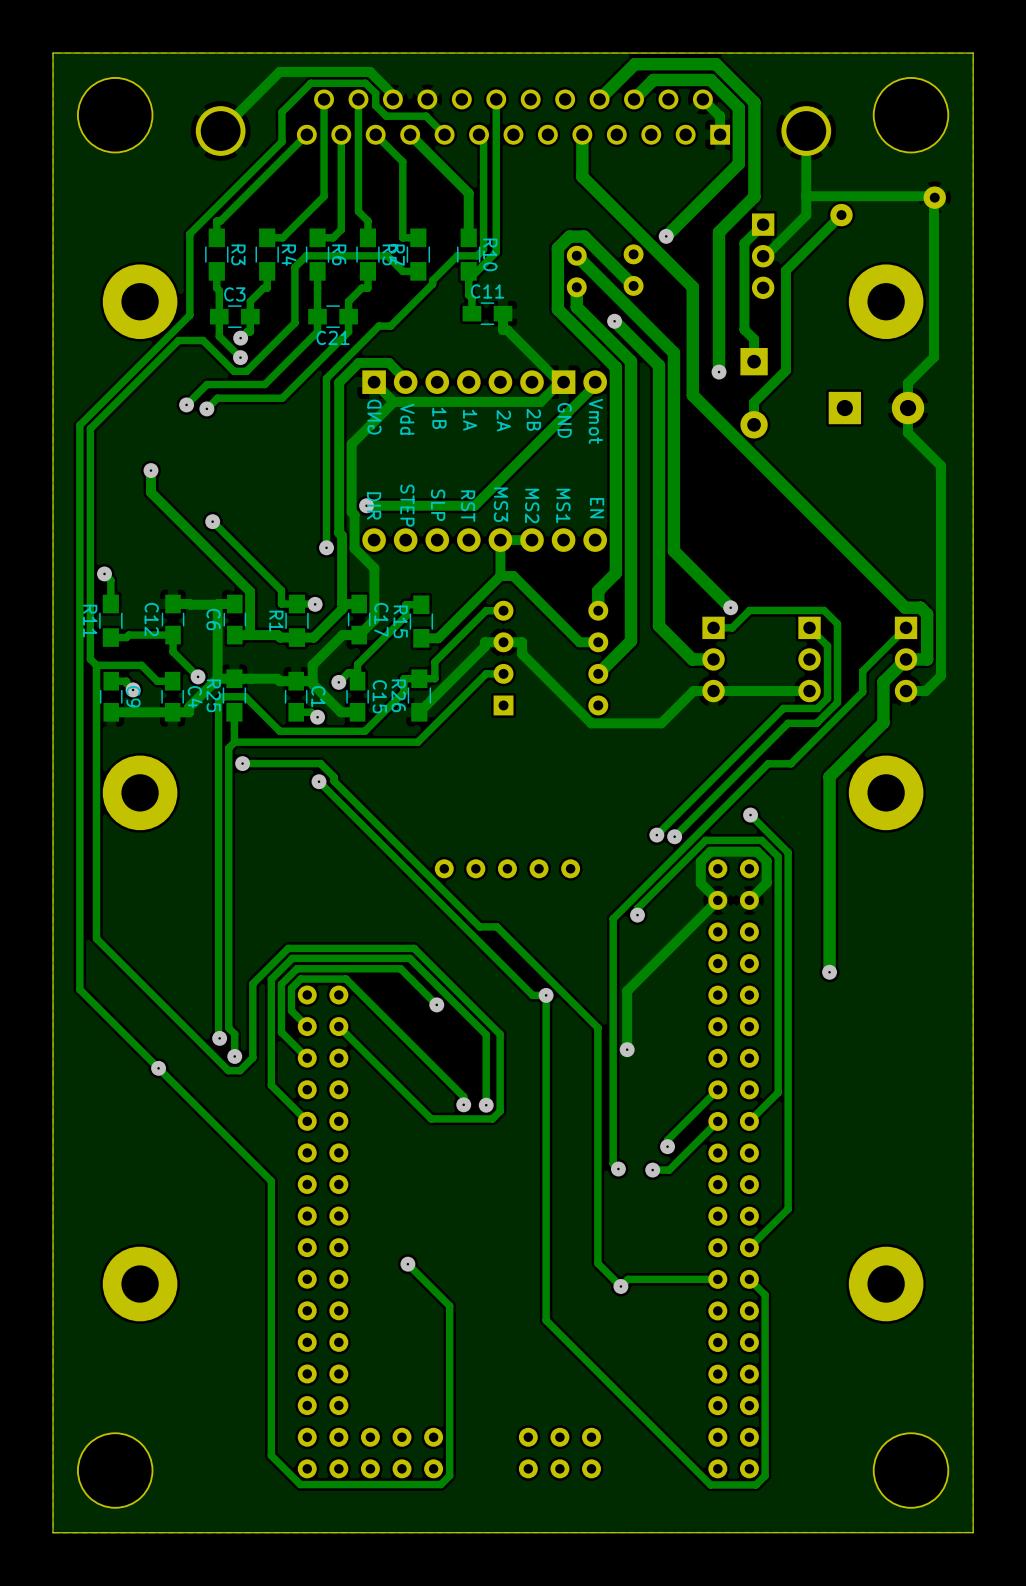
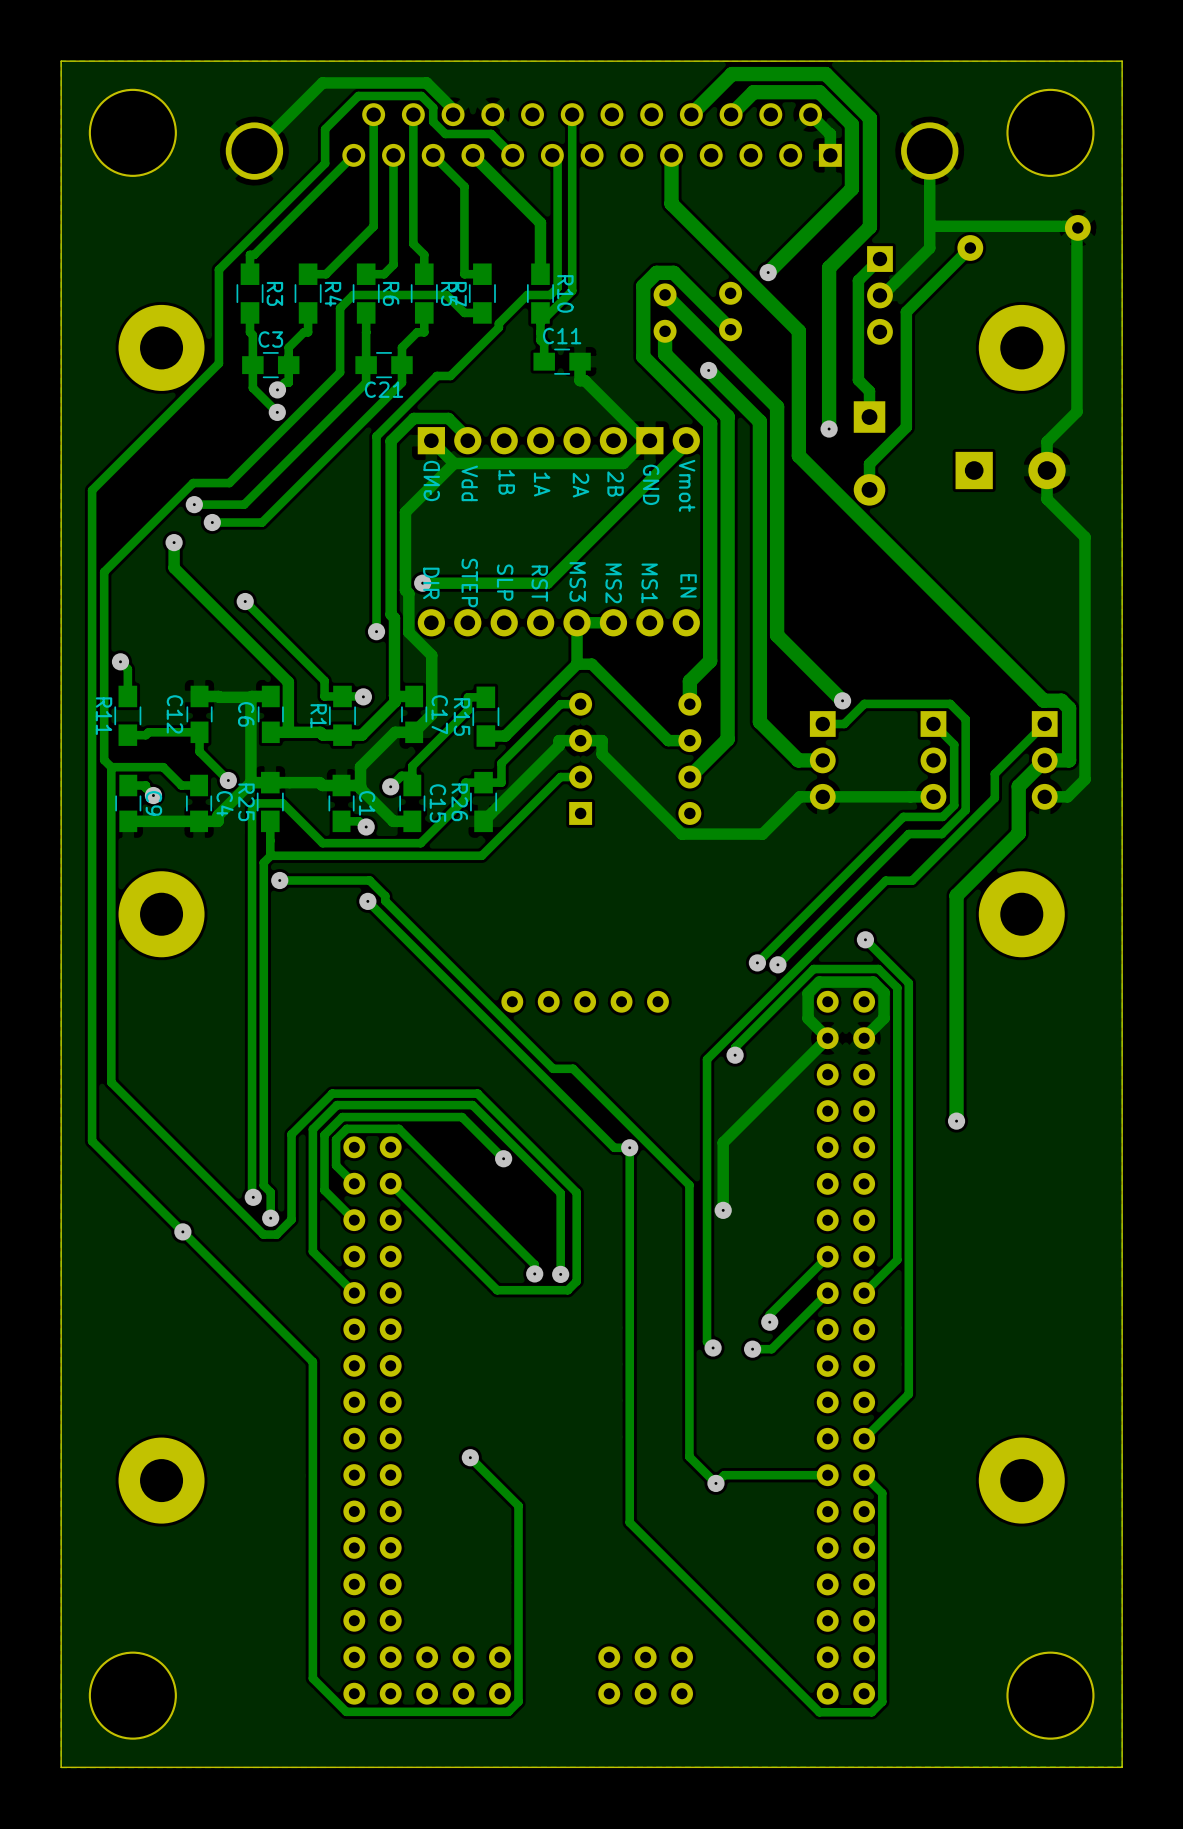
track: (317, 331) (264, 384) (206, 384) (186, 404) -> (366, 382) (244, 504) (194, 504)
track: (246, 371) (233, 371) (203, 340) (178, 340) (90, 428) (90, 496) -> (284, 428) (229, 483) (193, 483) (104, 572)
track: (282, 398) (217, 398) (206, 408) -> (325, 459) (262, 522) (212, 522)
via: (186, 404) -> none
via: (206, 408) -> none
via: none -> (194, 504)
via: none -> (212, 522)

